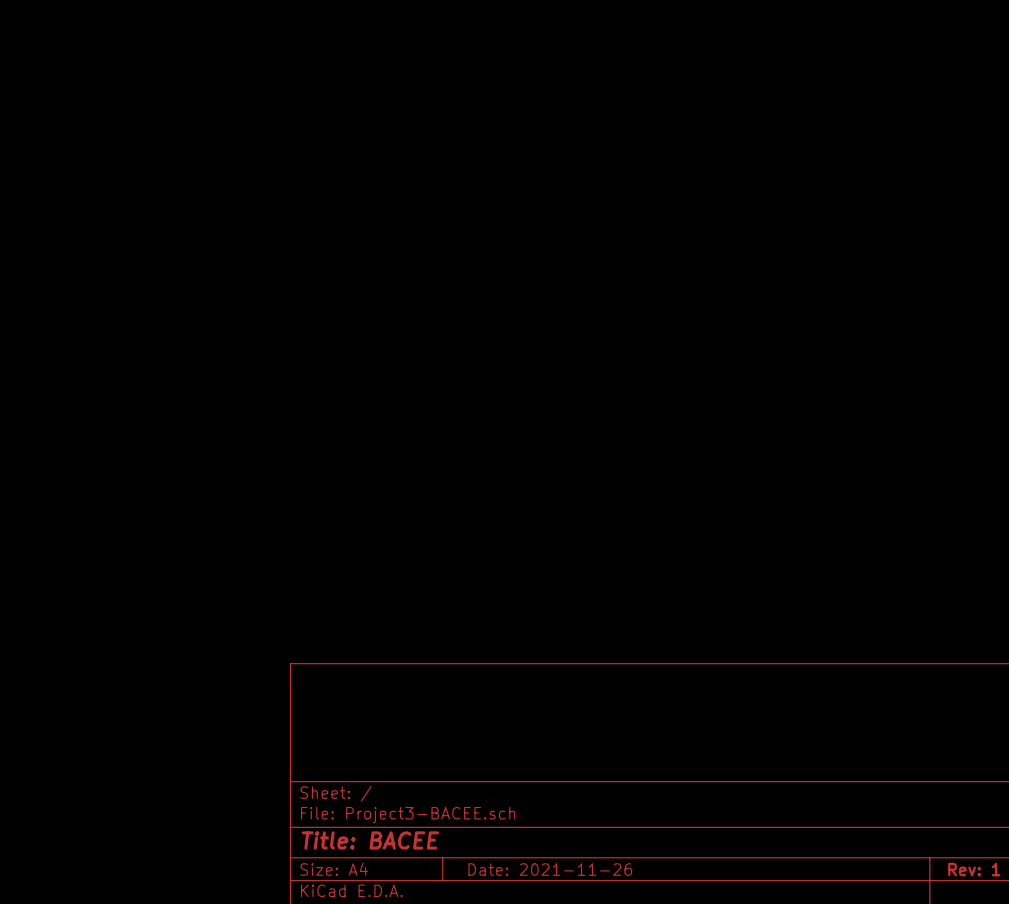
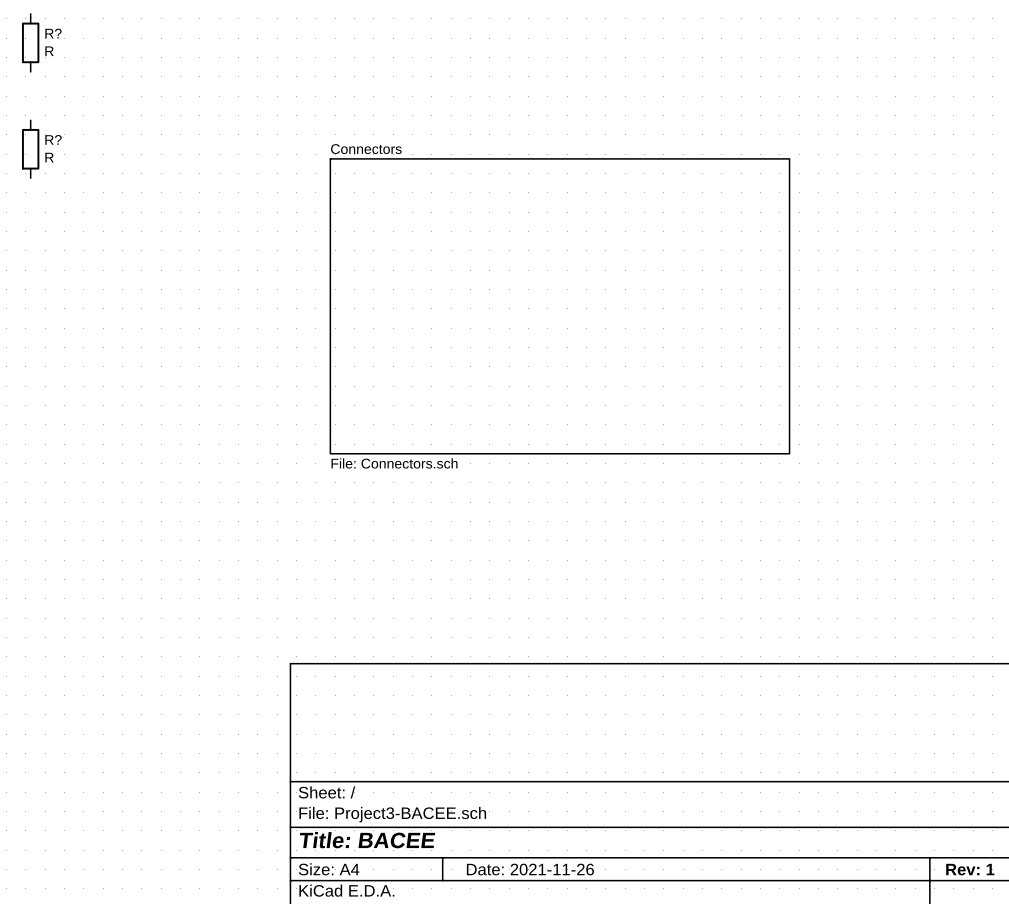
R?: none -> R (30, 42)
R?: none -> R (30, 149)
sheet Connectors: none -> File: Connectors.sch (559, 306)

